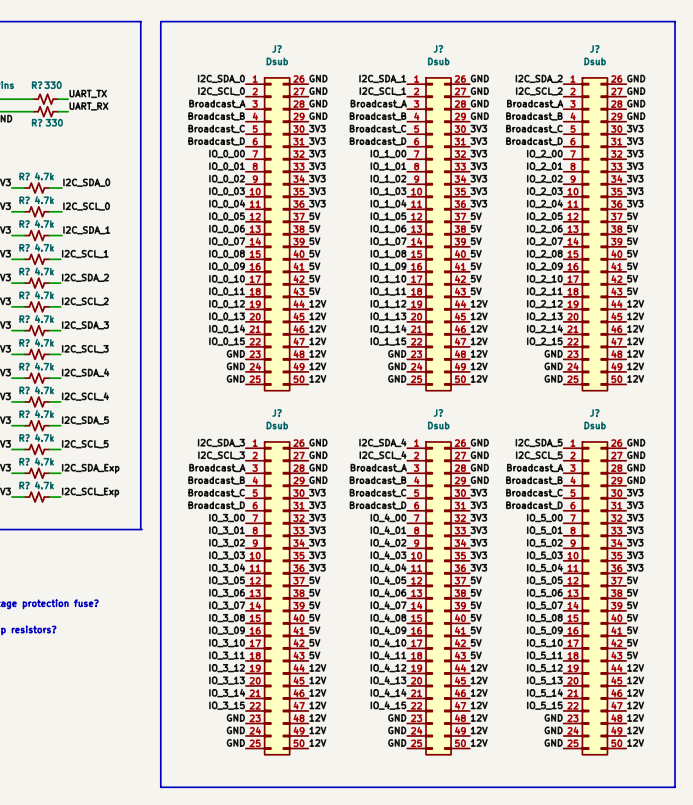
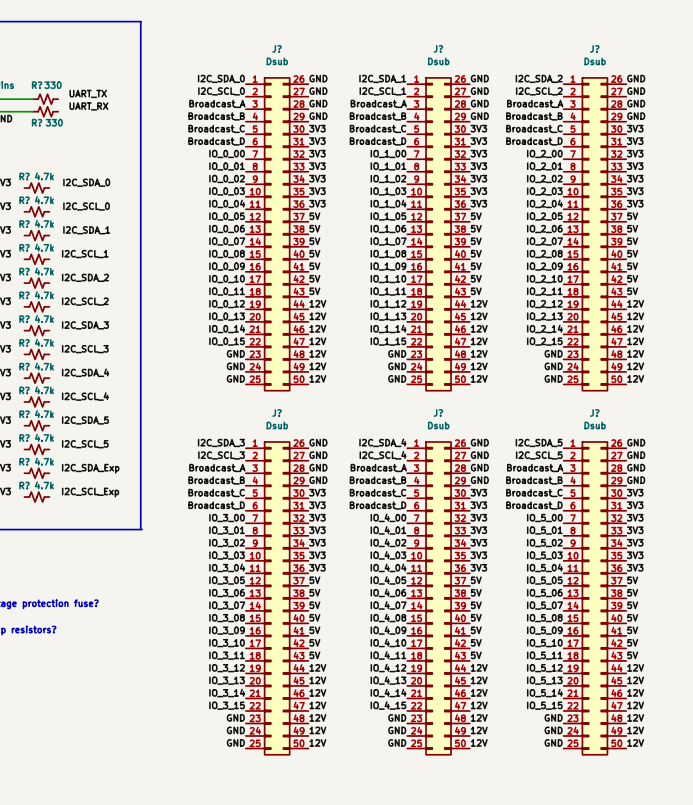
line: (160, 21) (675, 21) (675, 787) (160, 787) (160, 22) -> none
wire: (58, 99) (68, 99) -> none
wire: (58, 111) (68, 111) -> none
wire: (11, 188) (24, 188) -> none
wire: (49, 188) (61, 188) -> none
wire: (11, 211) (24, 211) -> none
wire: (49, 211) (61, 211) -> none
wire: (11, 235) (24, 235) -> none
wire: (49, 235) (61, 235) -> none
wire: (11, 259) (24, 259) -> none
wire: (49, 259) (60, 259) -> none
wire: (11, 283) (24, 283) -> none
wire: (49, 283) (60, 283) -> none
wire: (11, 306) (24, 306) -> none
wire: (49, 306) (60, 306) -> none
wire: (11, 330) (24, 330) -> none
wire: (49, 330) (60, 330) -> none
wire: (11, 354) (24, 354) -> none
wire: (49, 354) (60, 354) -> none
wire: (11, 378) (24, 378) -> none
wire: (49, 378) (60, 378) -> none
wire: (11, 401) (24, 401) -> none
wire: (49, 401) (60, 401) -> none
wire: (11, 425) (24, 425) -> none
wire: (49, 425) (60, 425) -> none
wire: (11, 449) (24, 449) -> none
wire: (49, 449) (60, 449) -> none
wire: (11, 473) (24, 473) -> none
wire: (49, 473) (60, 473) -> none
wire: (11, 497) (24, 497) -> none
wire: (49, 497) (60, 497) -> none

